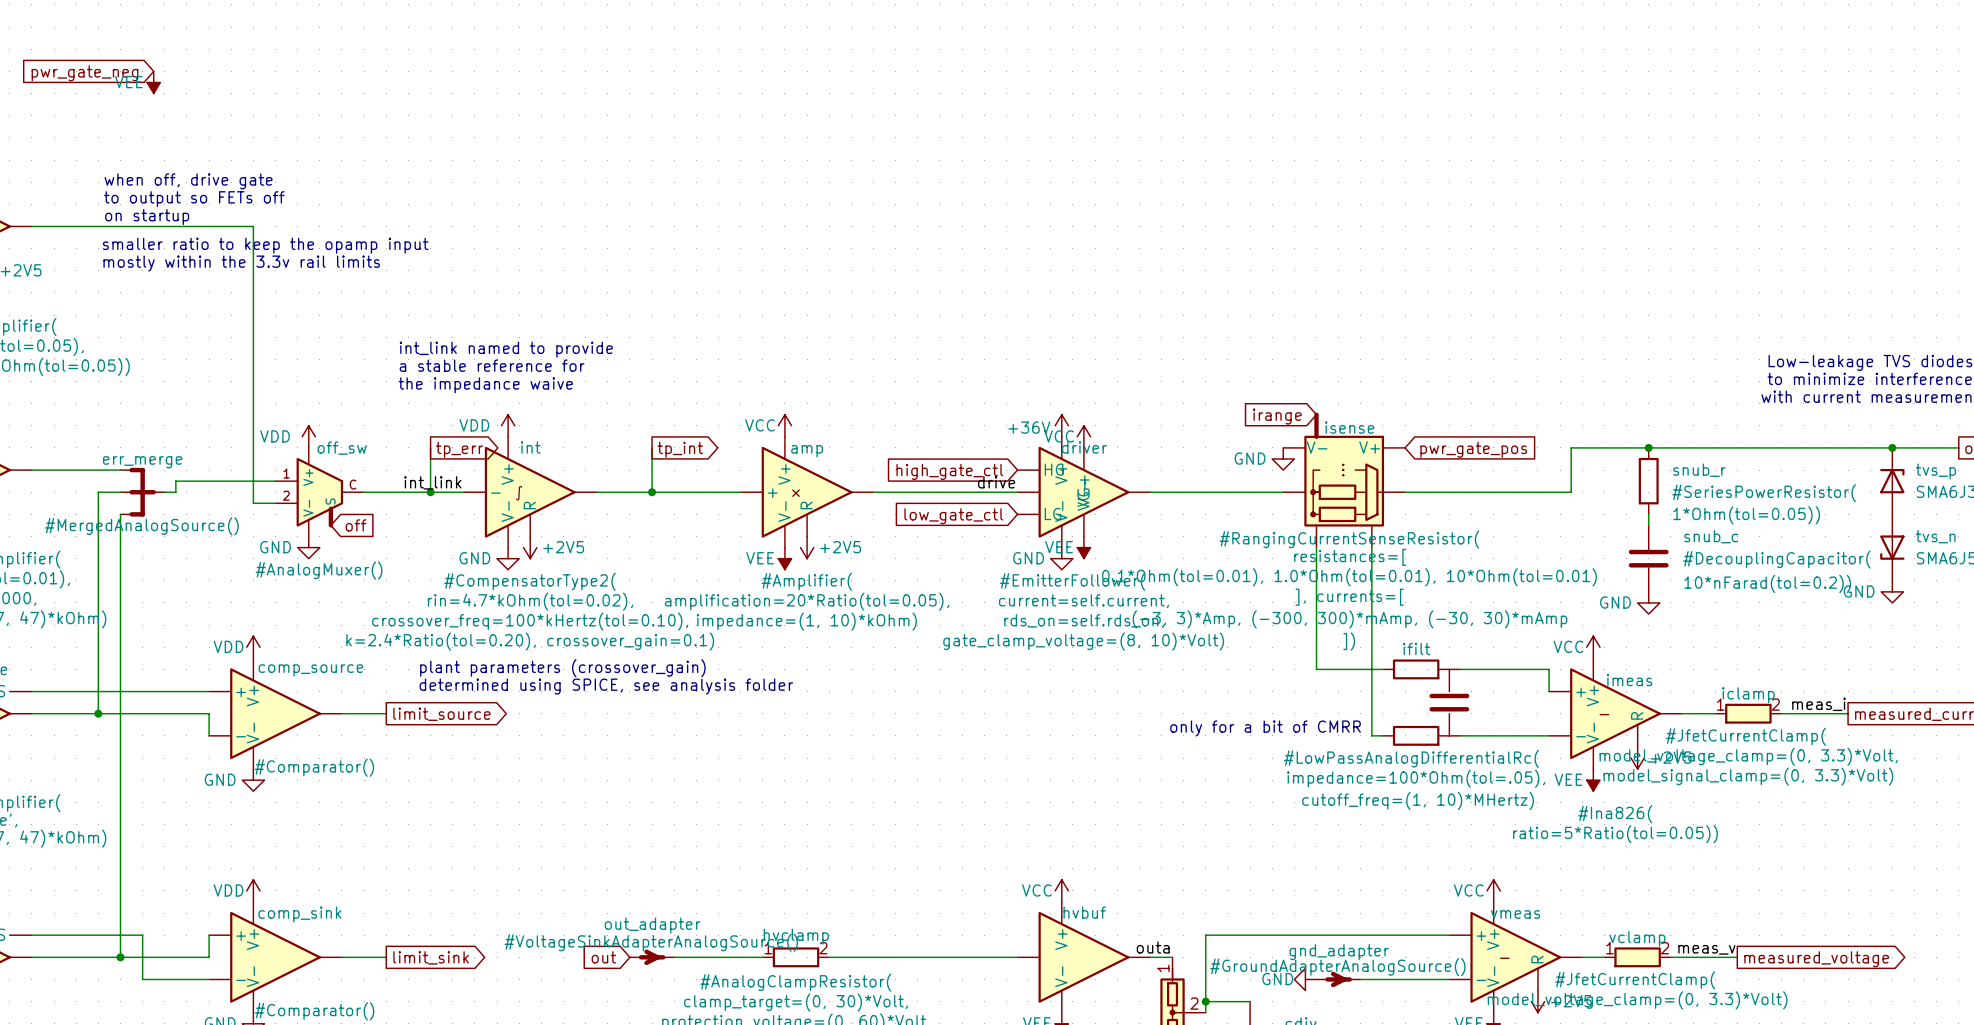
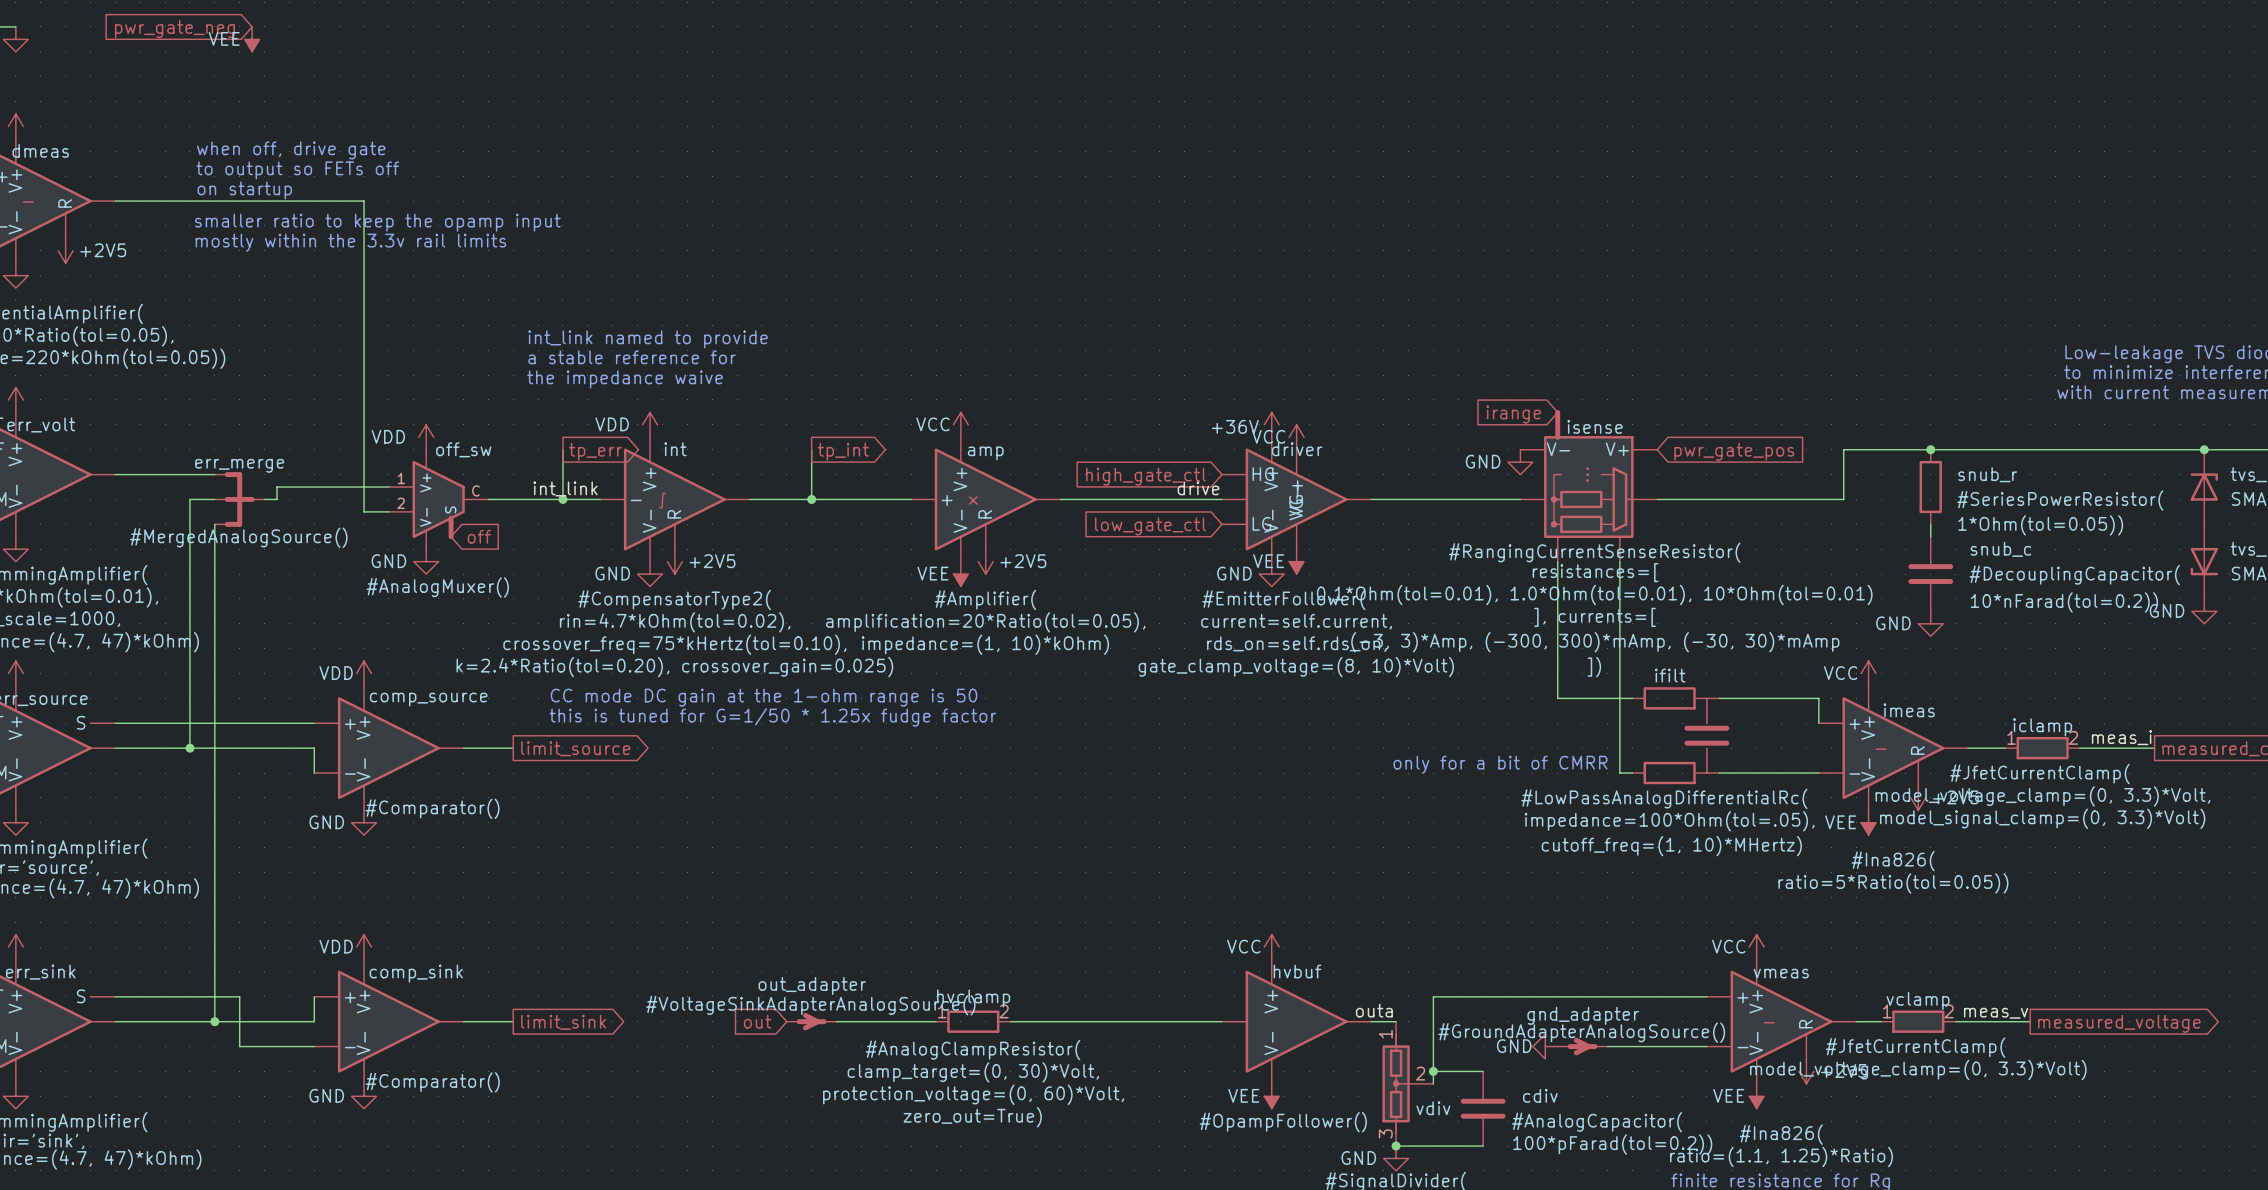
int text: crossover_freq=100*kHertz(tol=0.10), (530, 621) -> crossover_freq=75*kHertz(tol=0.10), (674, 644)
int text: k=2.4*Ratio(tol=0.20), crossover_gain=0.1) (530, 641) -> k=2.4*Ratio(tol=0.20), crossover_gain=0.025) (674, 667)
text: plant parameters (crossover_gain) (562, 668) -> CC mode DC gain at the 1-ohm range is 50 (763, 697)
text: determined using SPICE, see analysis folder (606, 686) -> this is tuned for G=1/50 * 1.25x fudge factor (772, 717)

